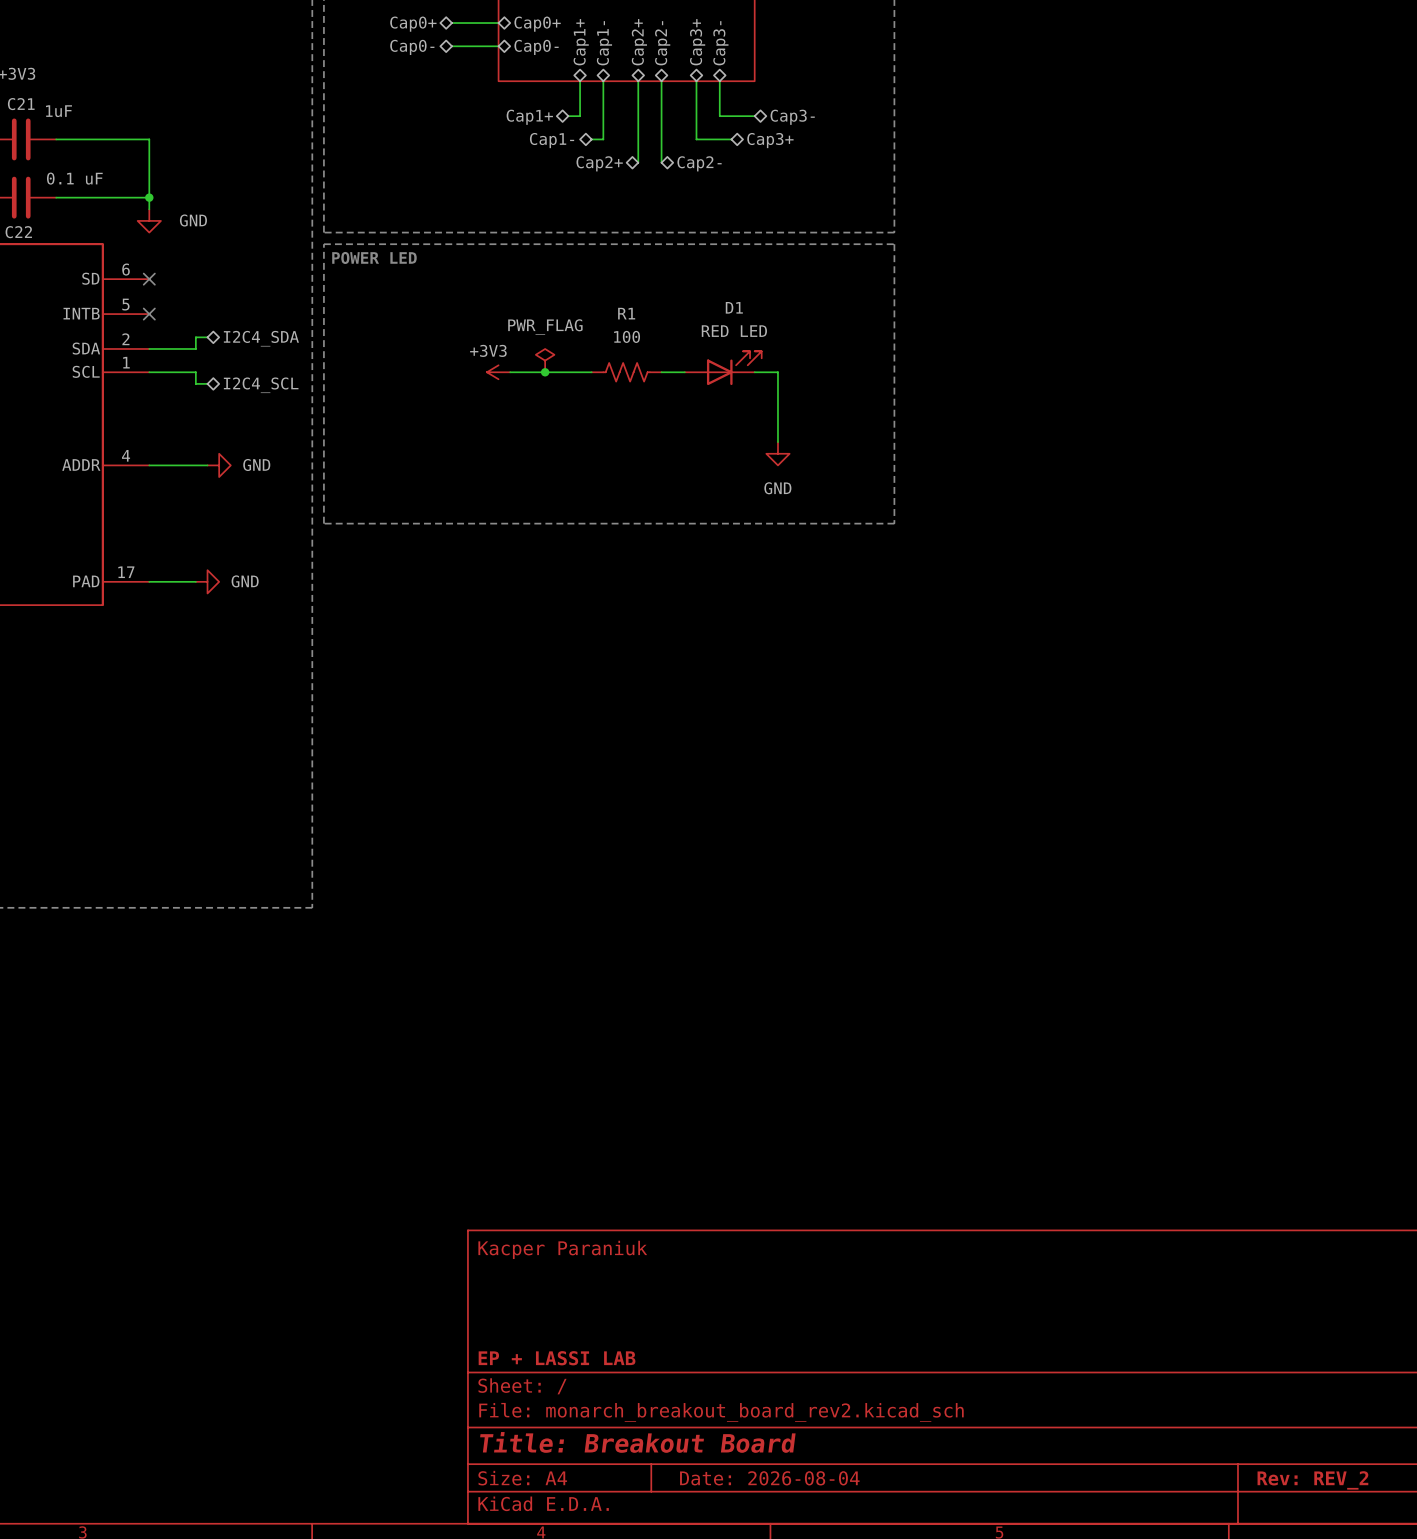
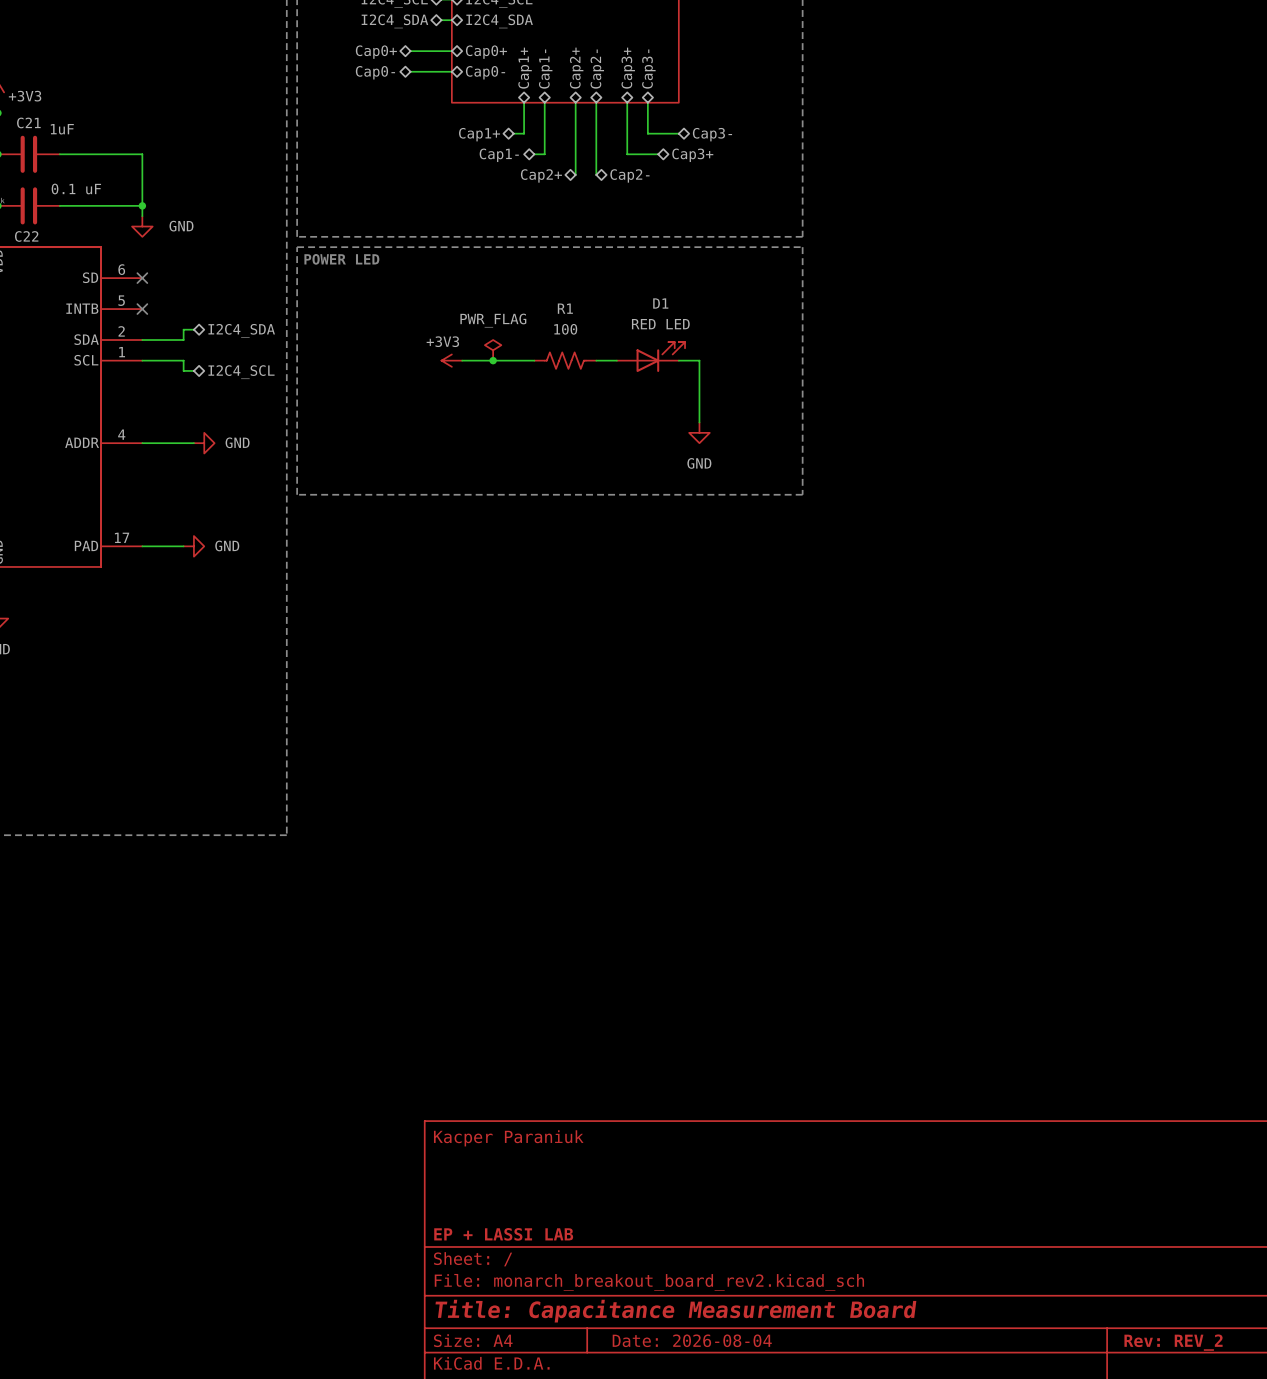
title block: Title: Breakout Board (637, 1442) -> Title: Capacitance Measurement Board (675, 1311)

